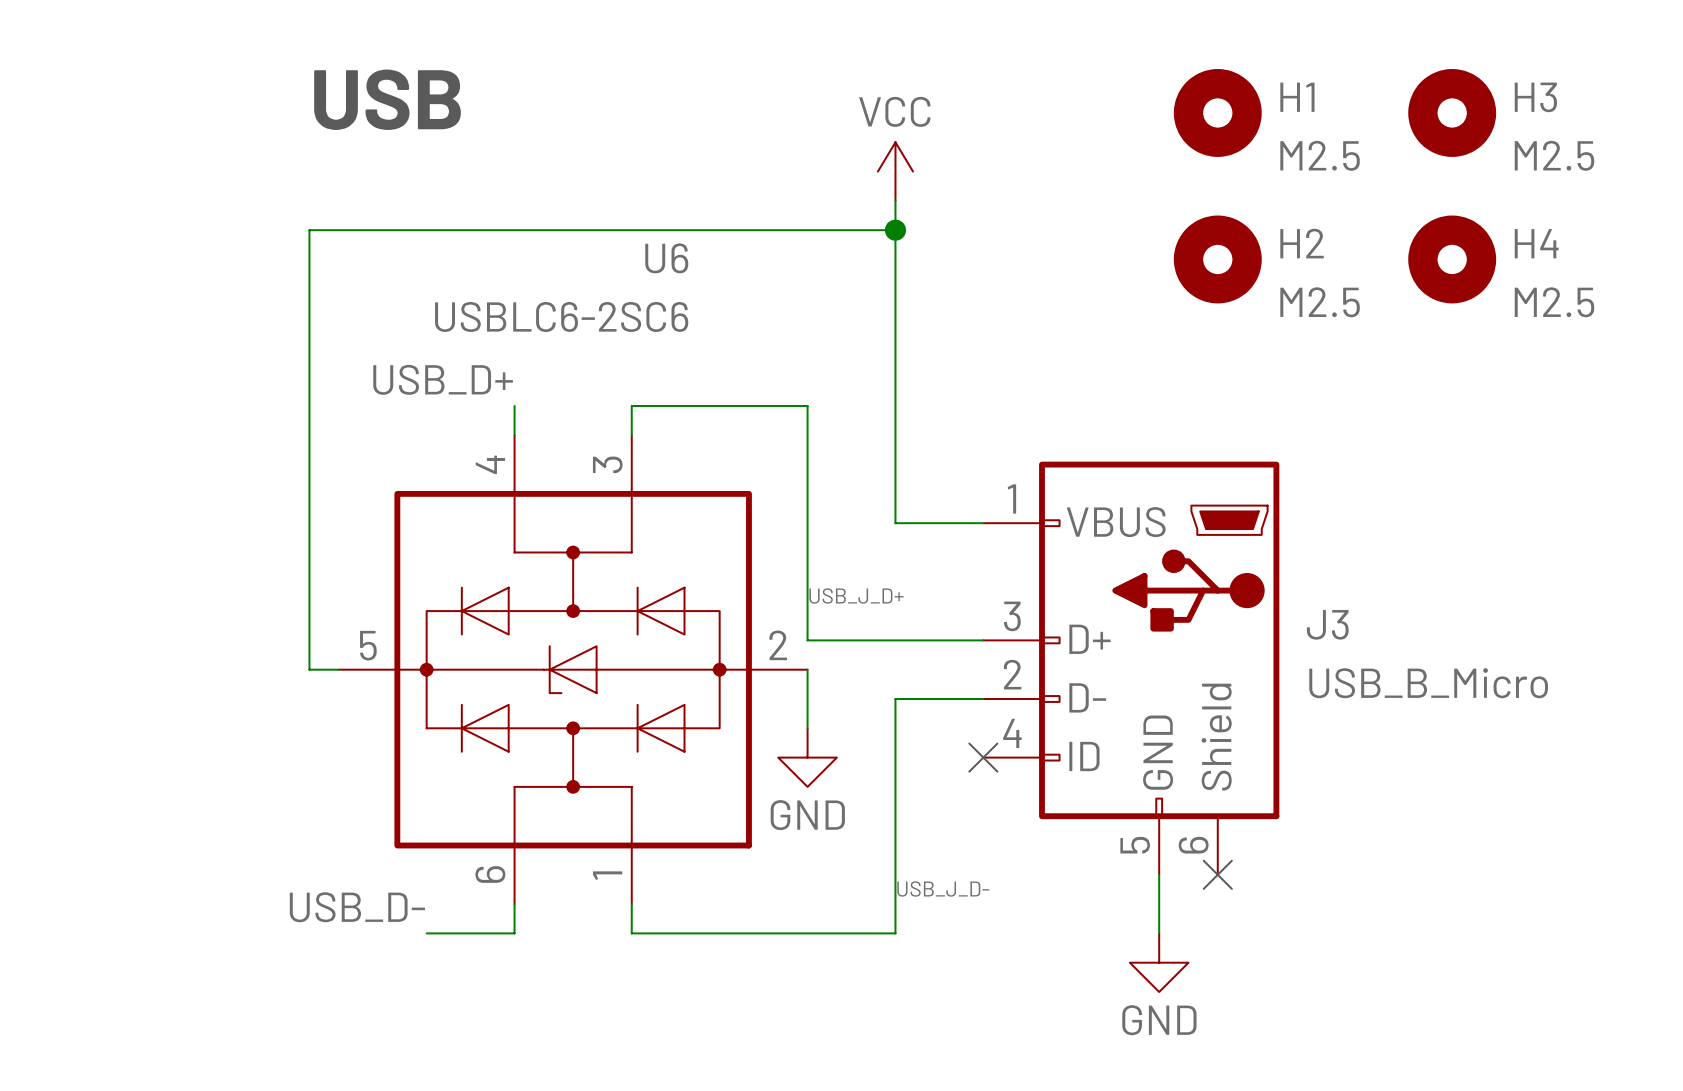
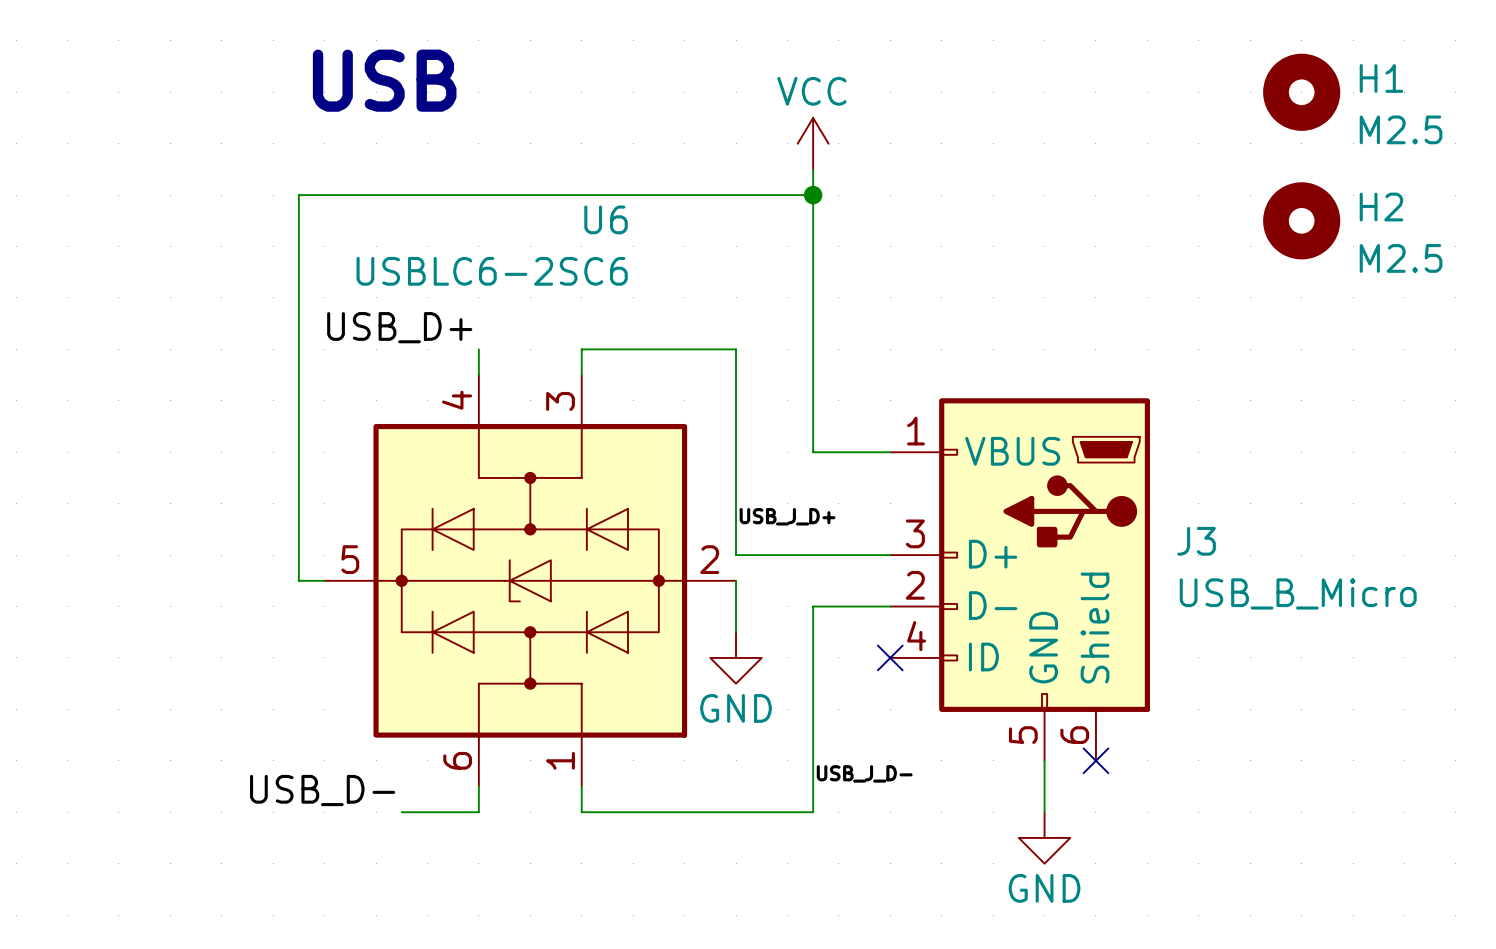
H3 name: H3 (1535, 97) -> H1 (1381, 78)
H1: M2.5 (1217, 112) -> none
H4 name: H4 (1536, 243) -> H2 (1381, 207)
H2: M2.5 (1217, 259) -> none

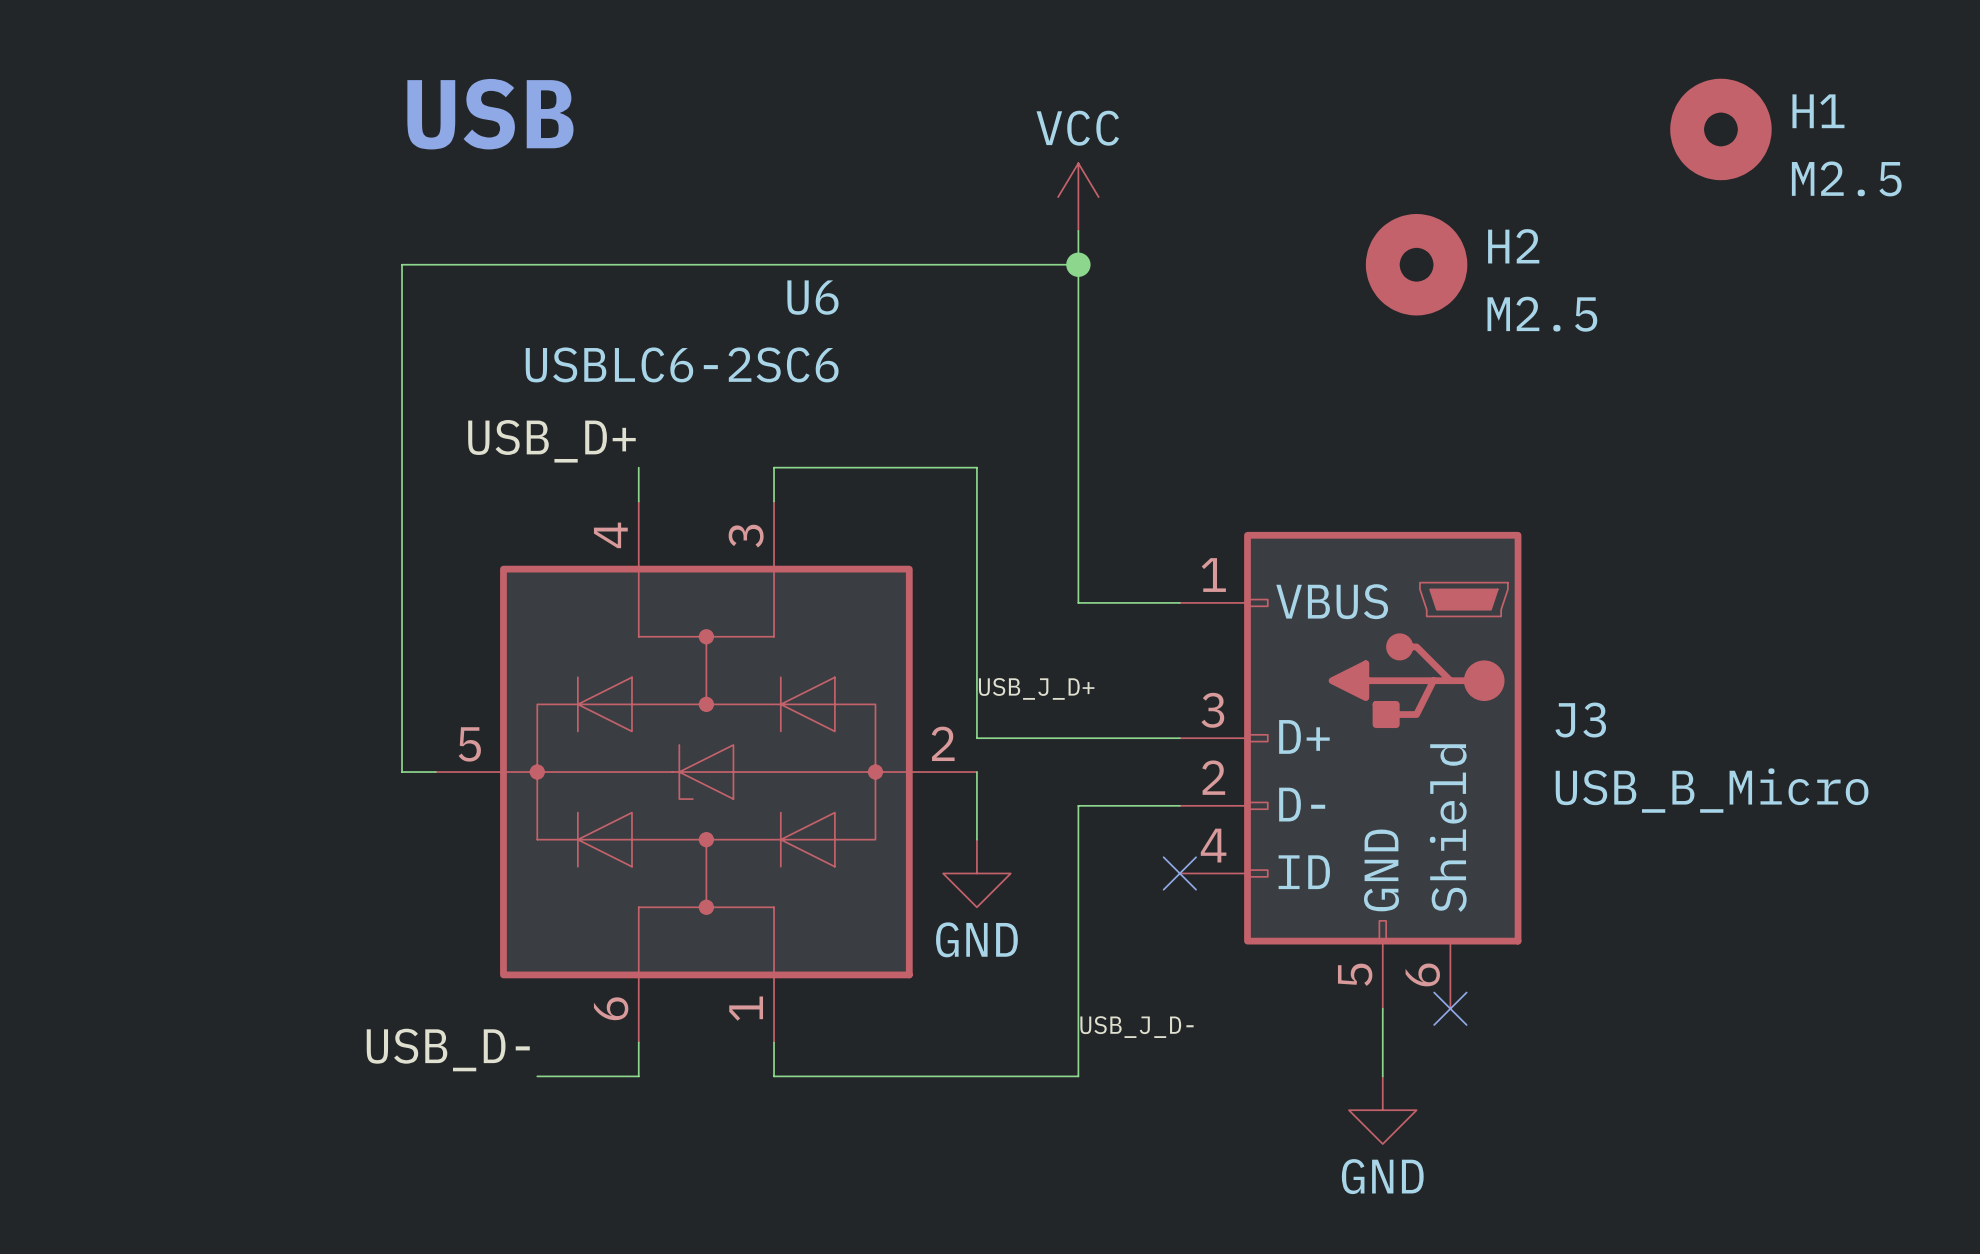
H2 position: (1301, 220) -> (1416, 264)

